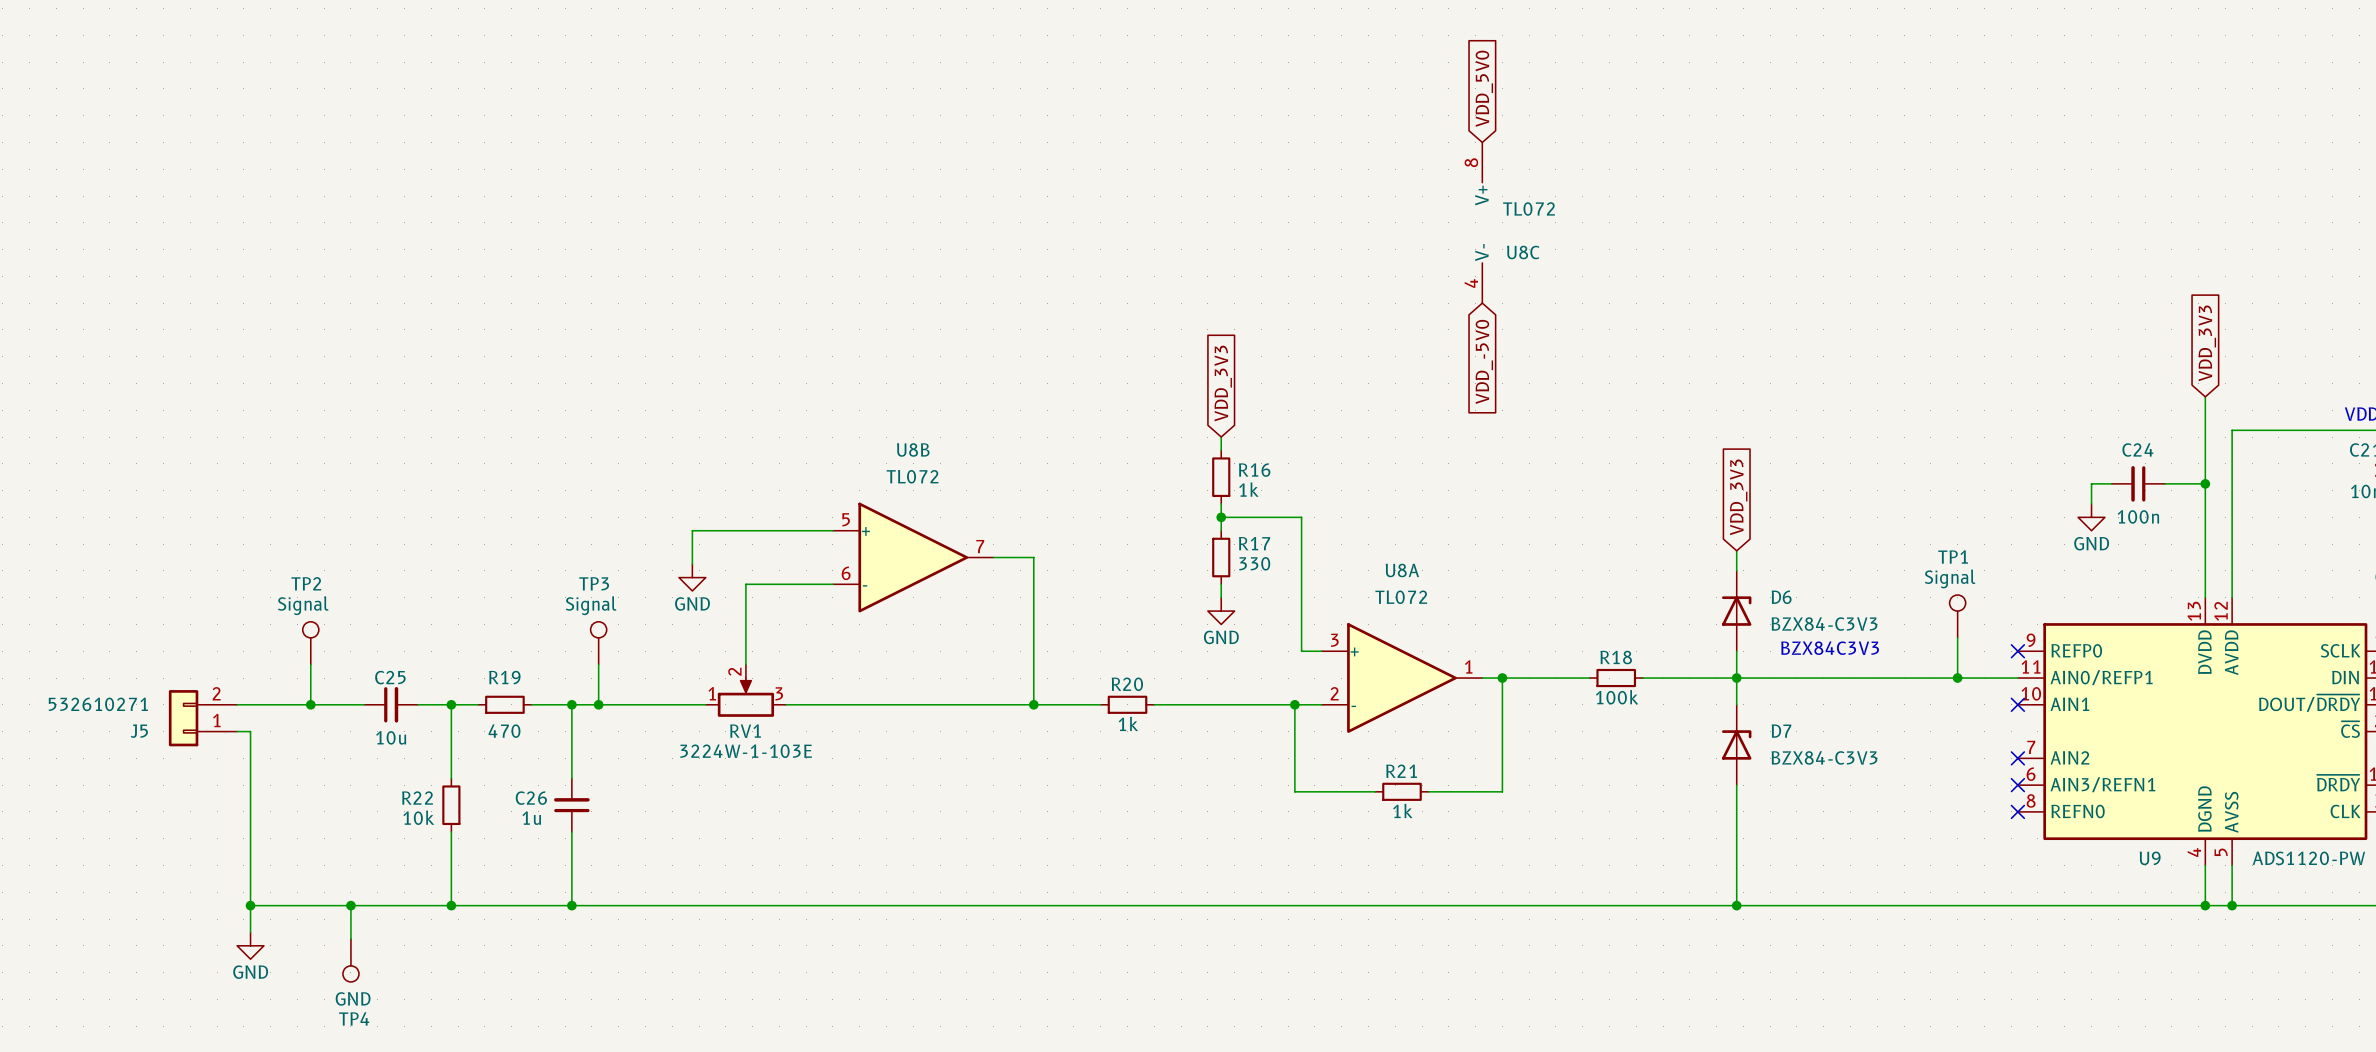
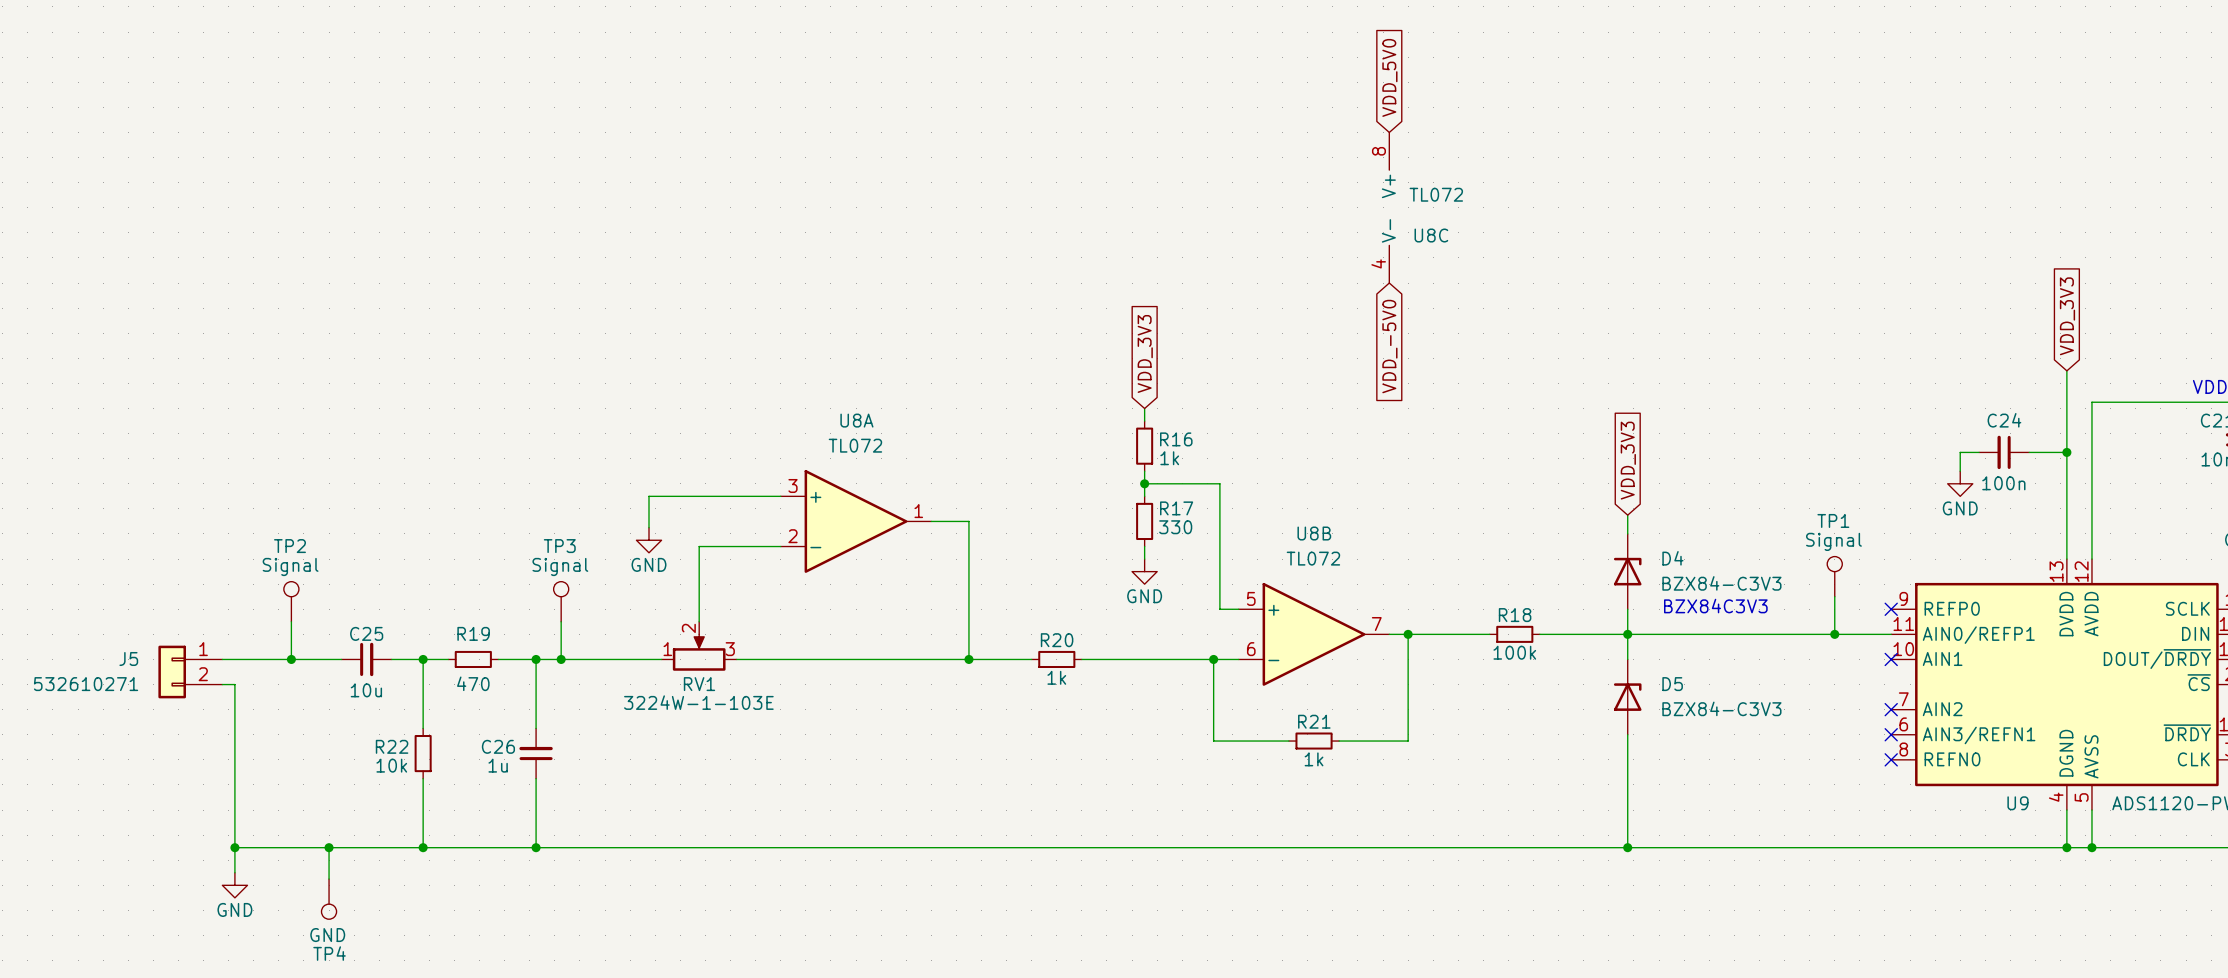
U8B position: (913, 557) -> (1314, 634)
D6 name: D6 (1781, 597) -> D4 (1672, 558)
U8A position: (1401, 678) -> (856, 521)
J5 flip: as is (183, 718) -> up-down (172, 672)
D7 name: D7 (1781, 731) -> D5 (1672, 684)

